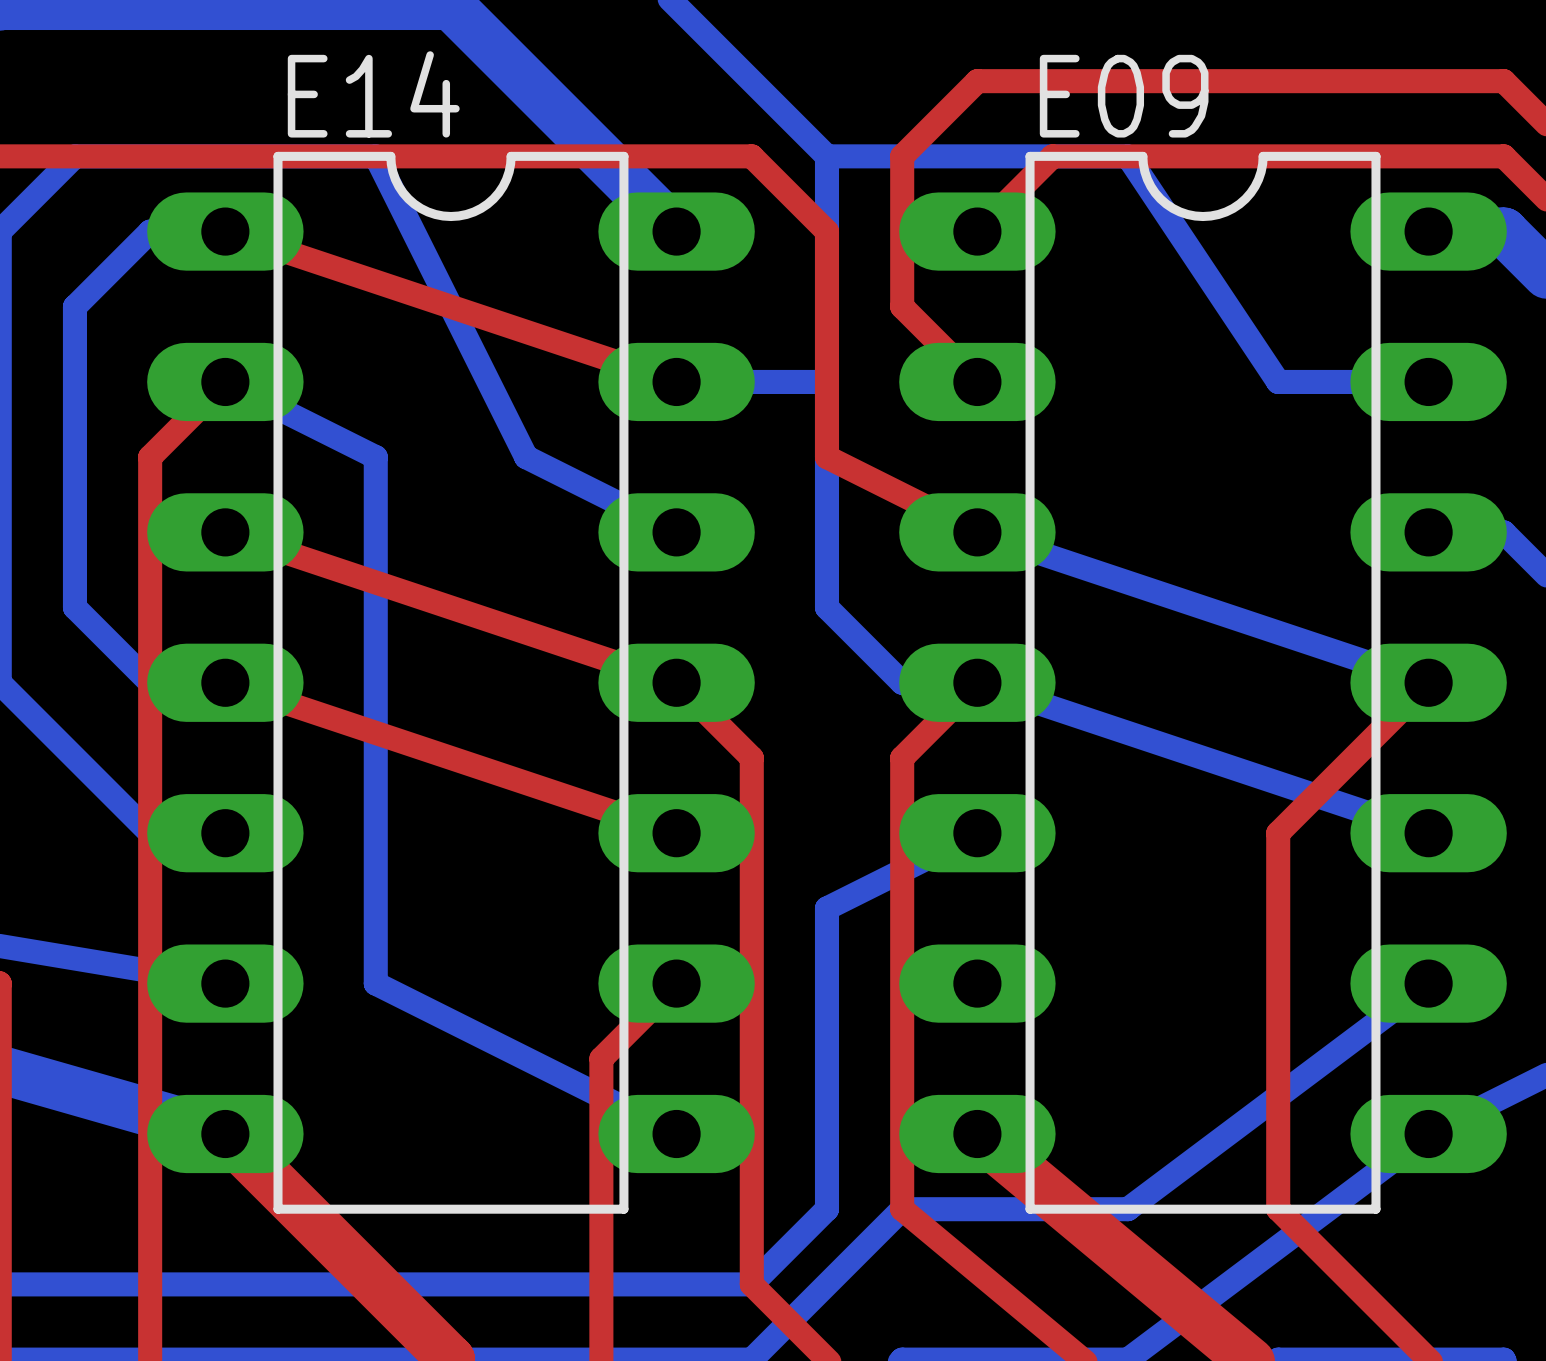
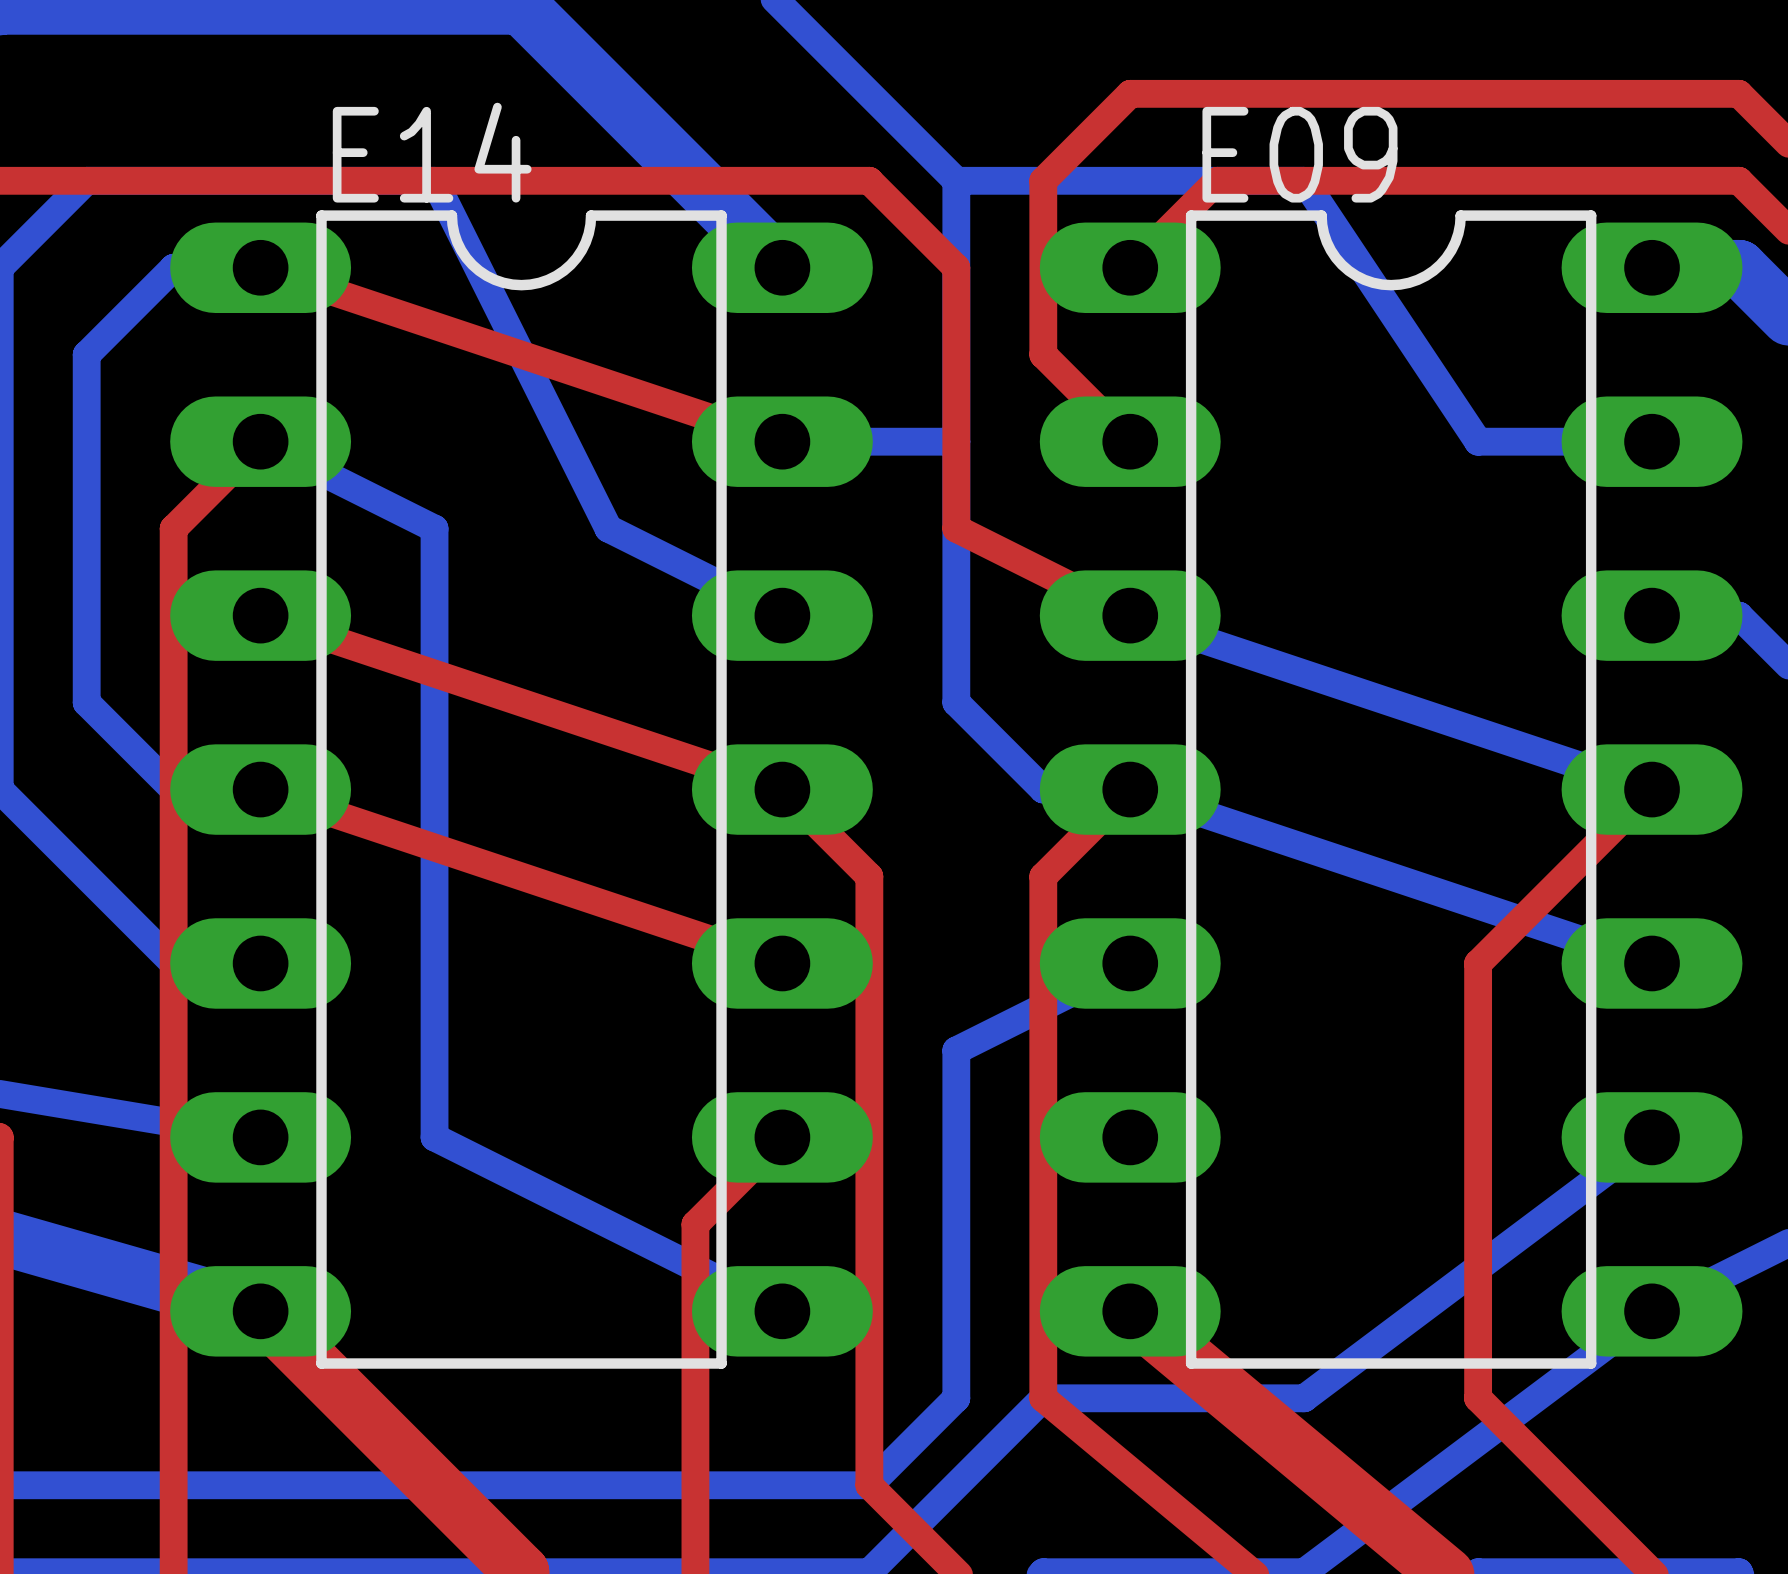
E14 name position: E14 (373, 94) -> E14 (432, 152)
E09 name position: E09 (1124, 96) -> E09 (1299, 154)
E14 footprint: [147, 151, 755, 1214] -> [170, 210, 873, 1369]
E09 footprint: [899, 151, 1507, 1214] -> [1039, 210, 1743, 1369]

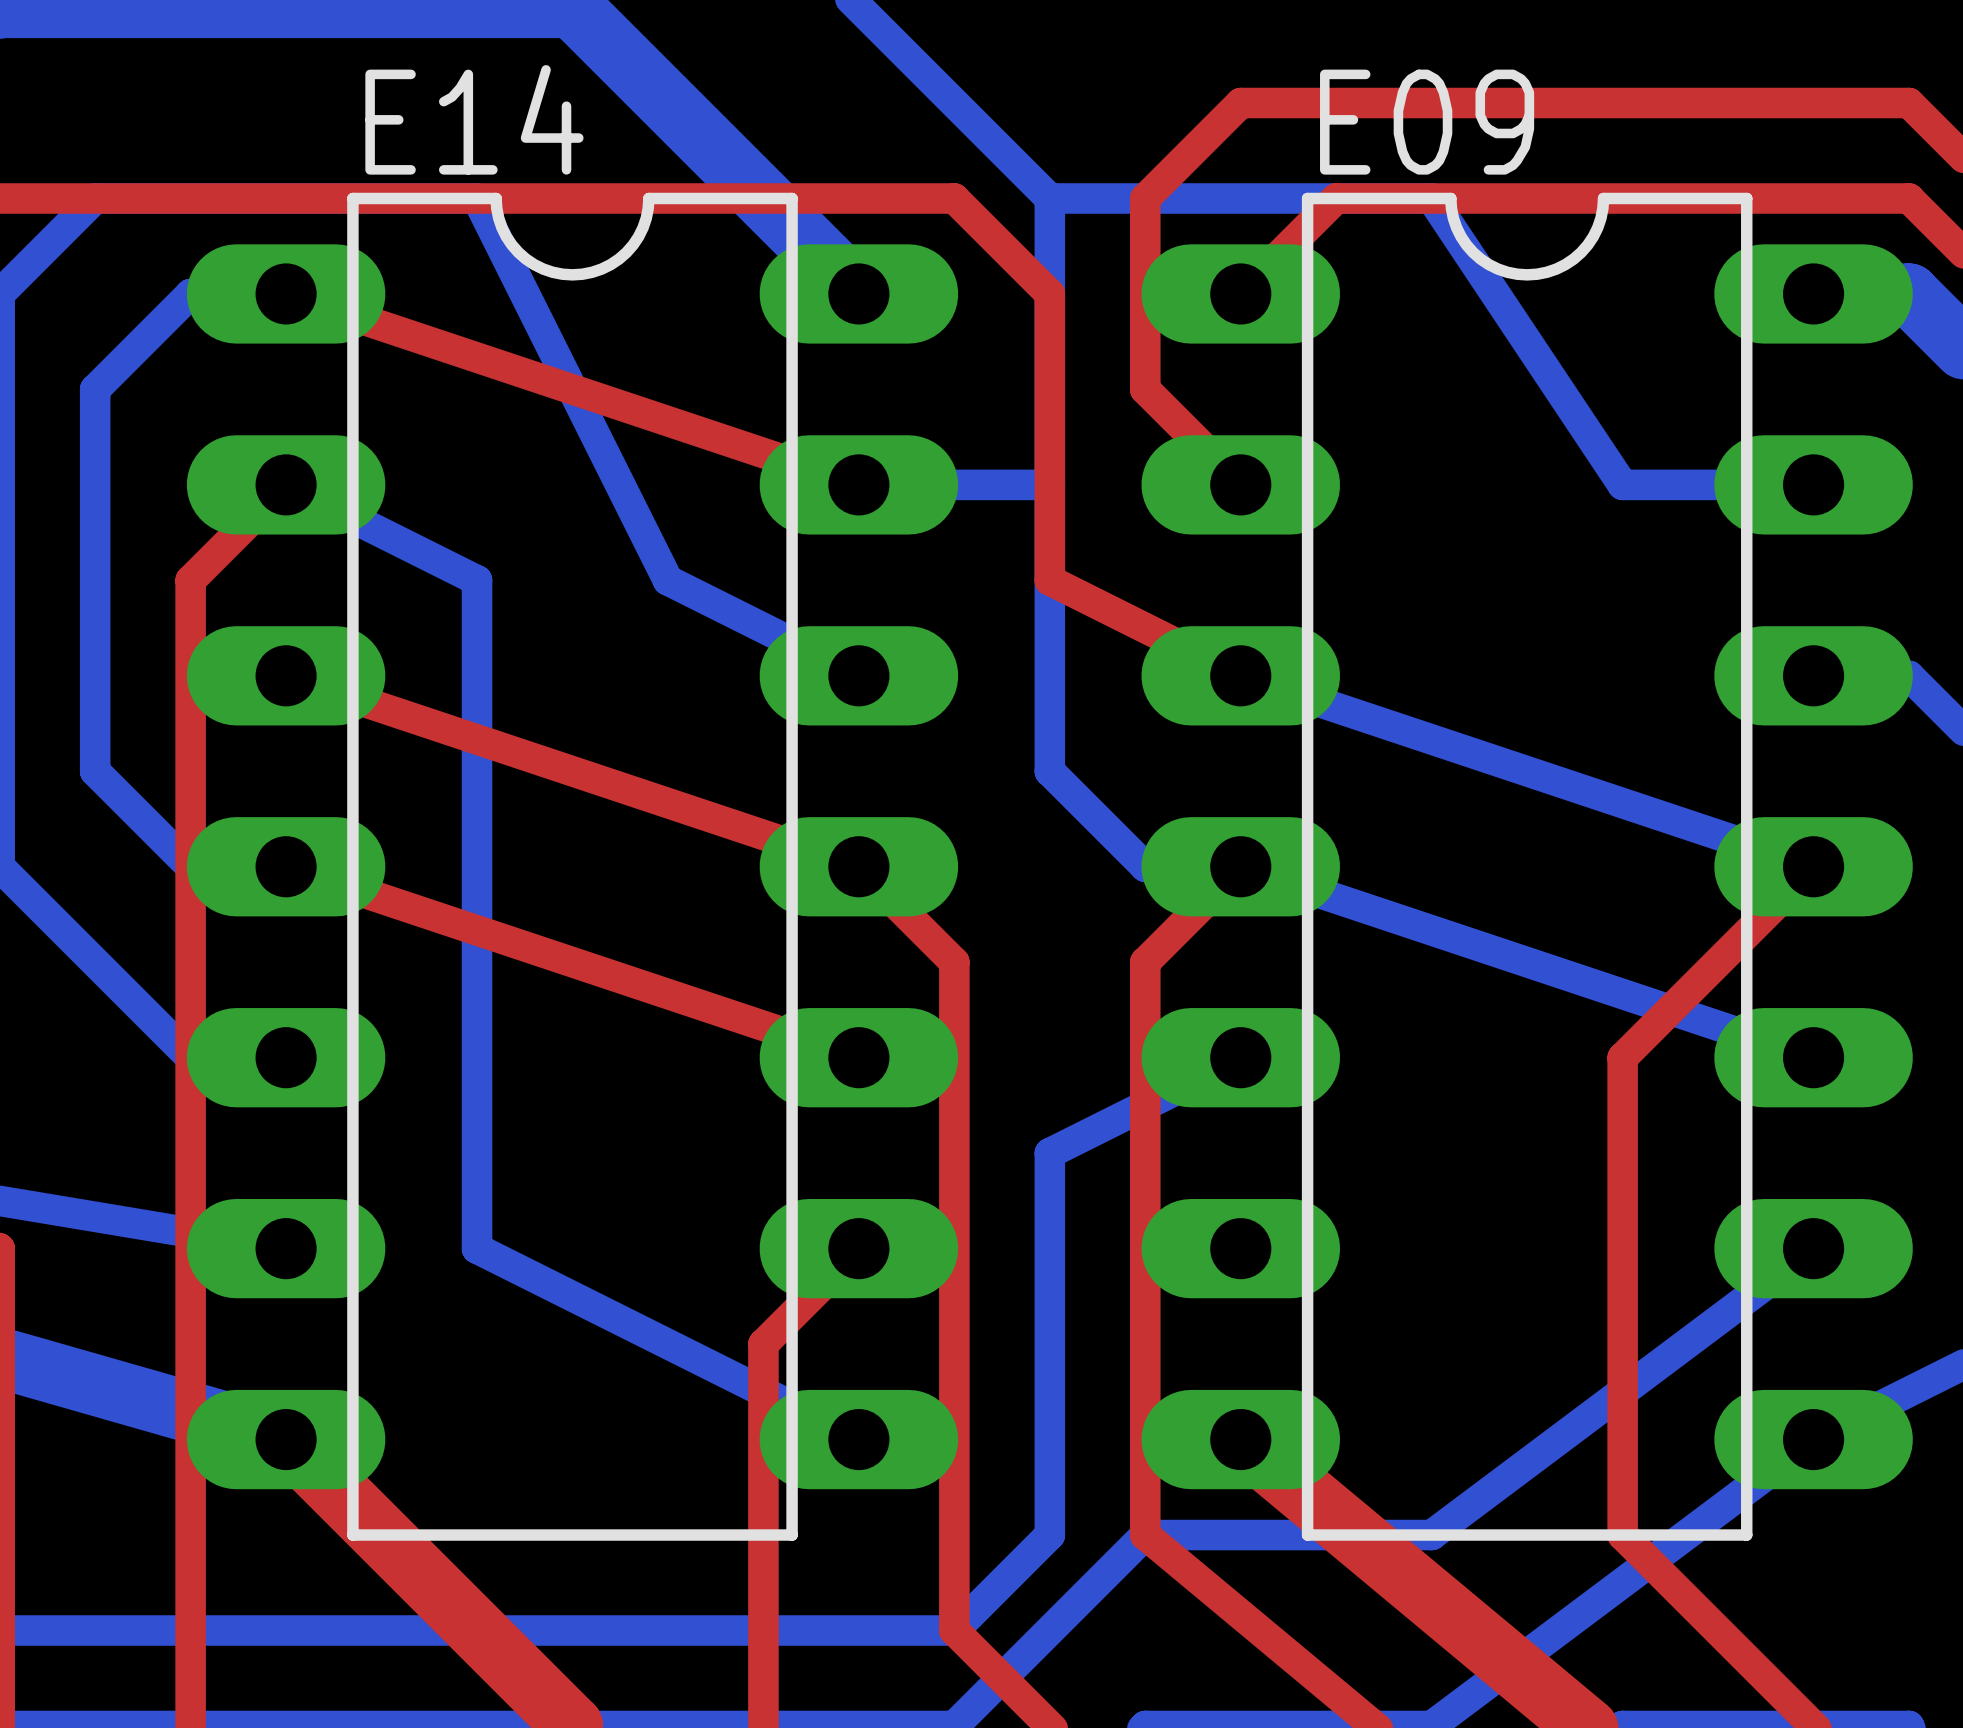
E14 name position: E14 (432, 152) -> E14 (474, 119)
E09 name position: E09 (1299, 154) -> E09 (1427, 122)
E14 footprint: [170, 210, 873, 1369] -> [186, 192, 959, 1541]
E09 footprint: [1039, 210, 1743, 1369] -> [1141, 192, 1913, 1541]

